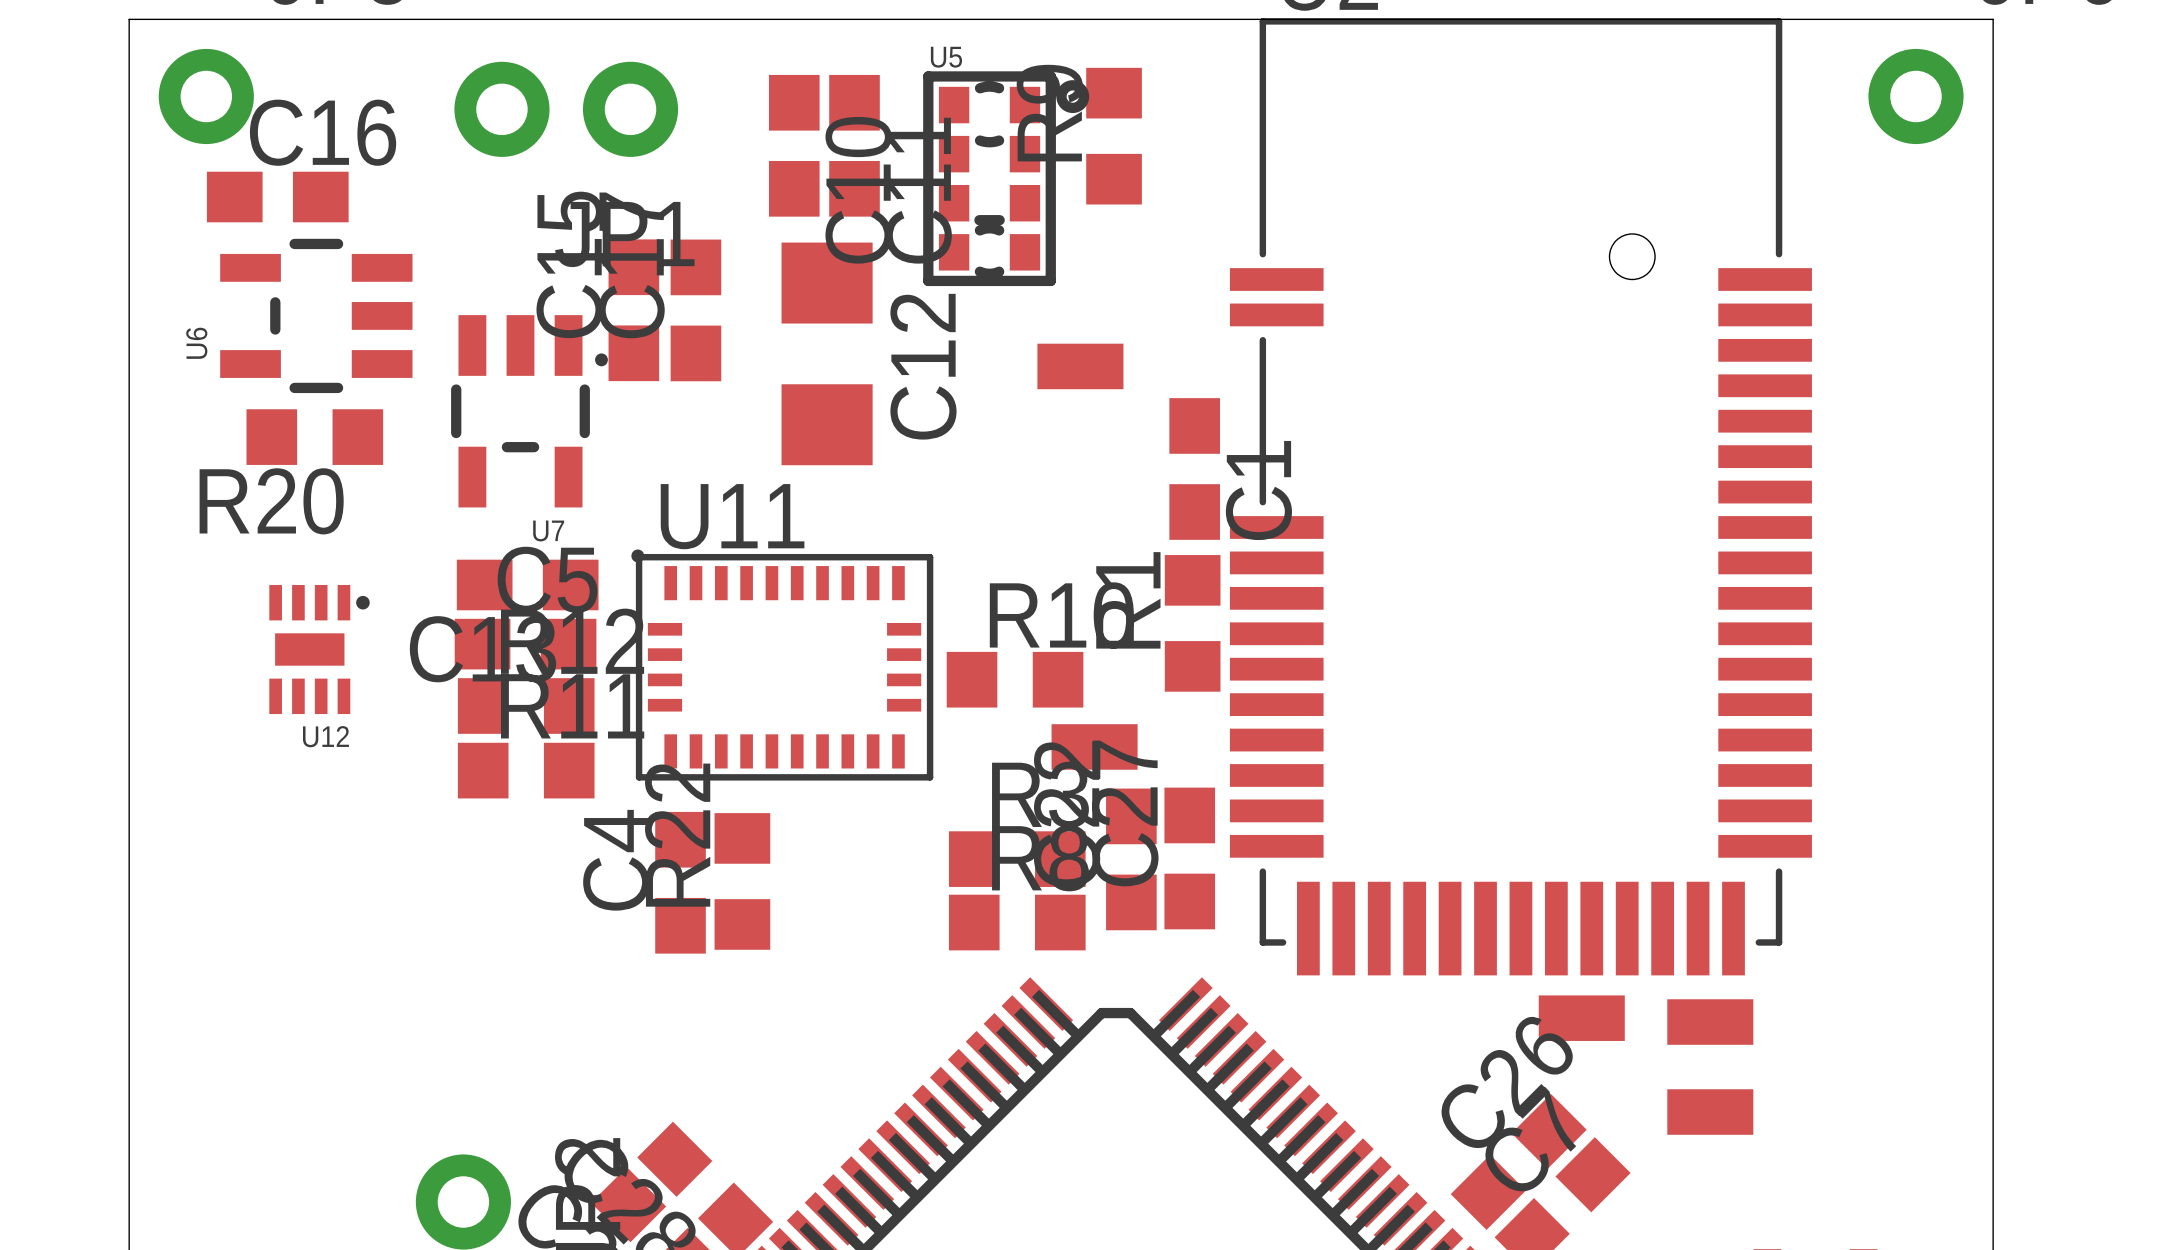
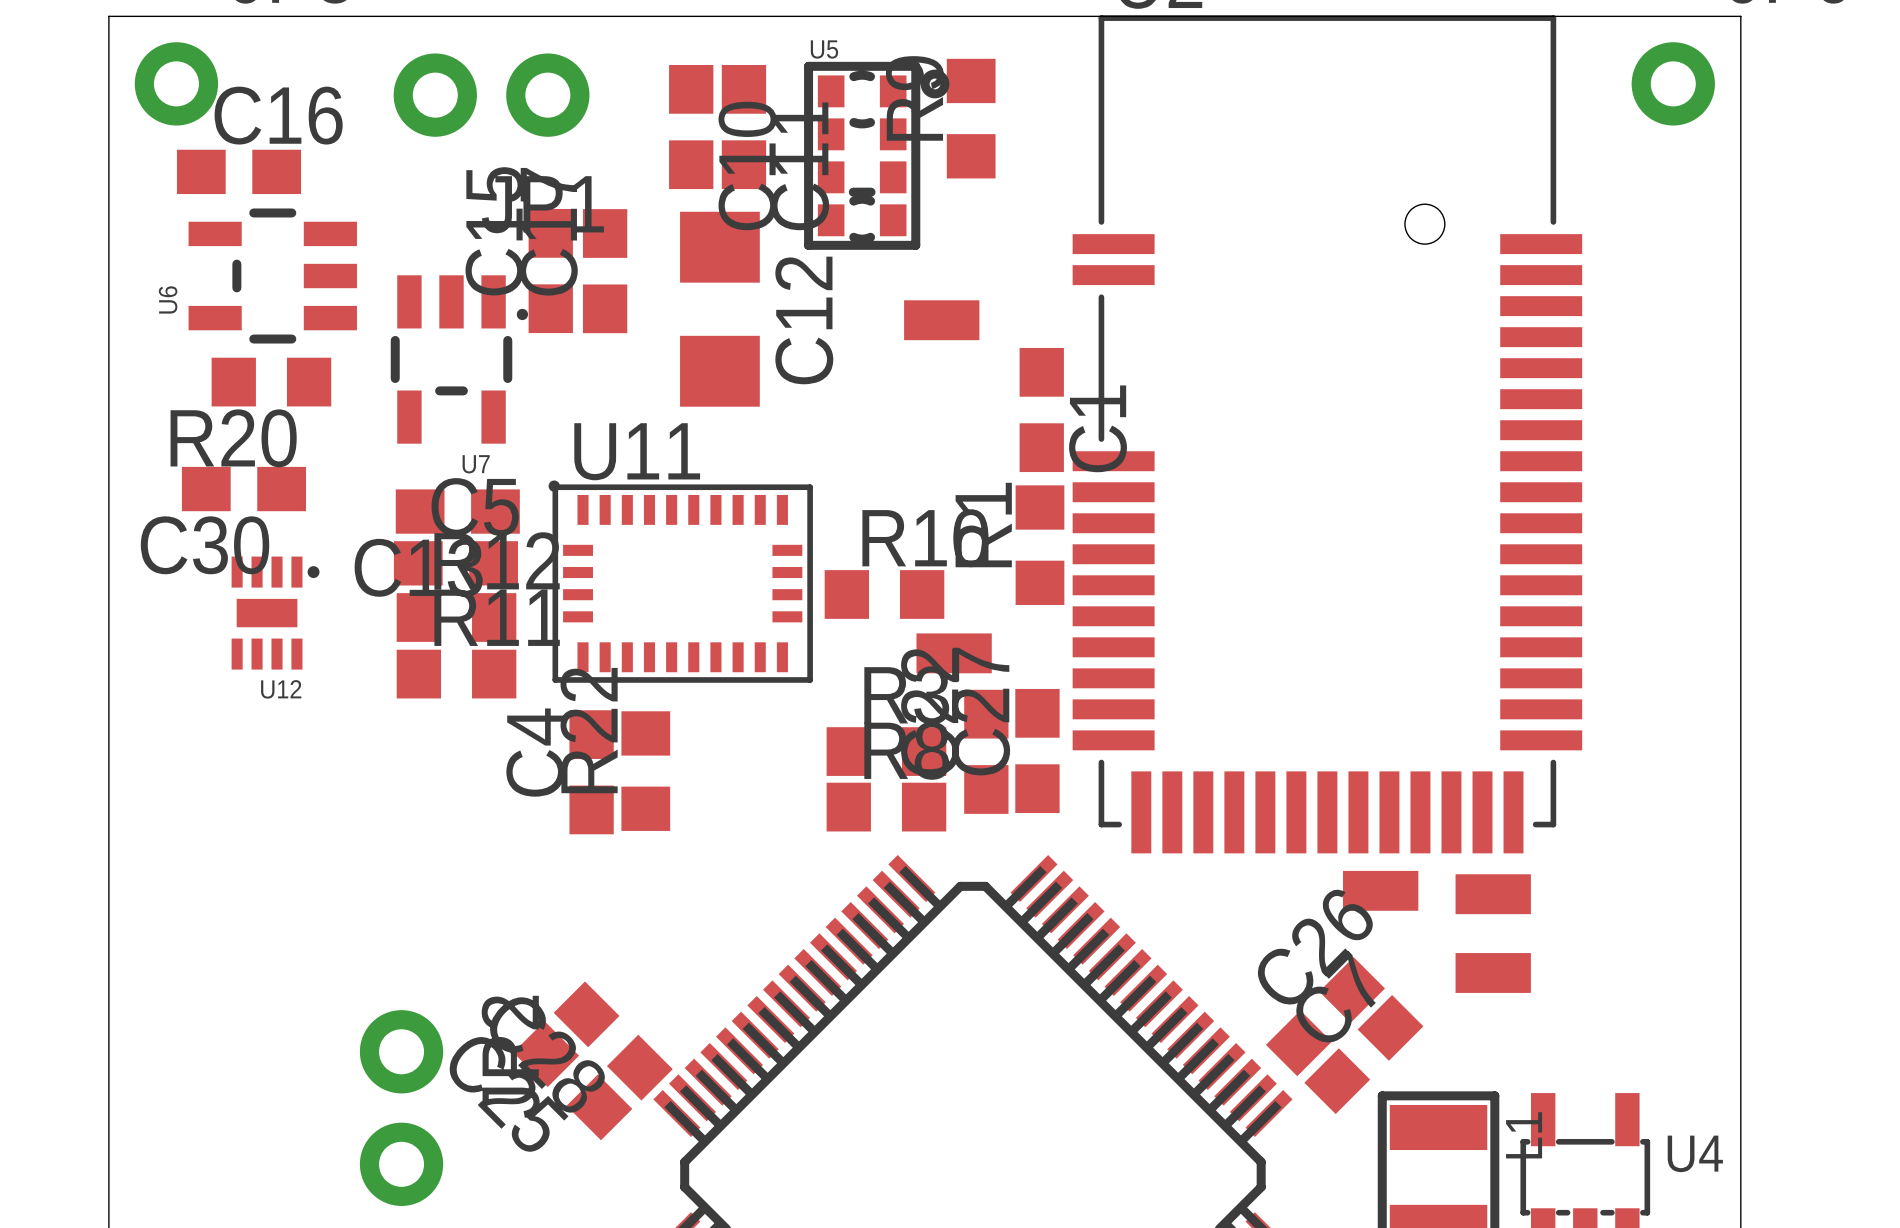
C30: none -> (243, 489)
U12 position: (319, 649) -> (275, 613)

